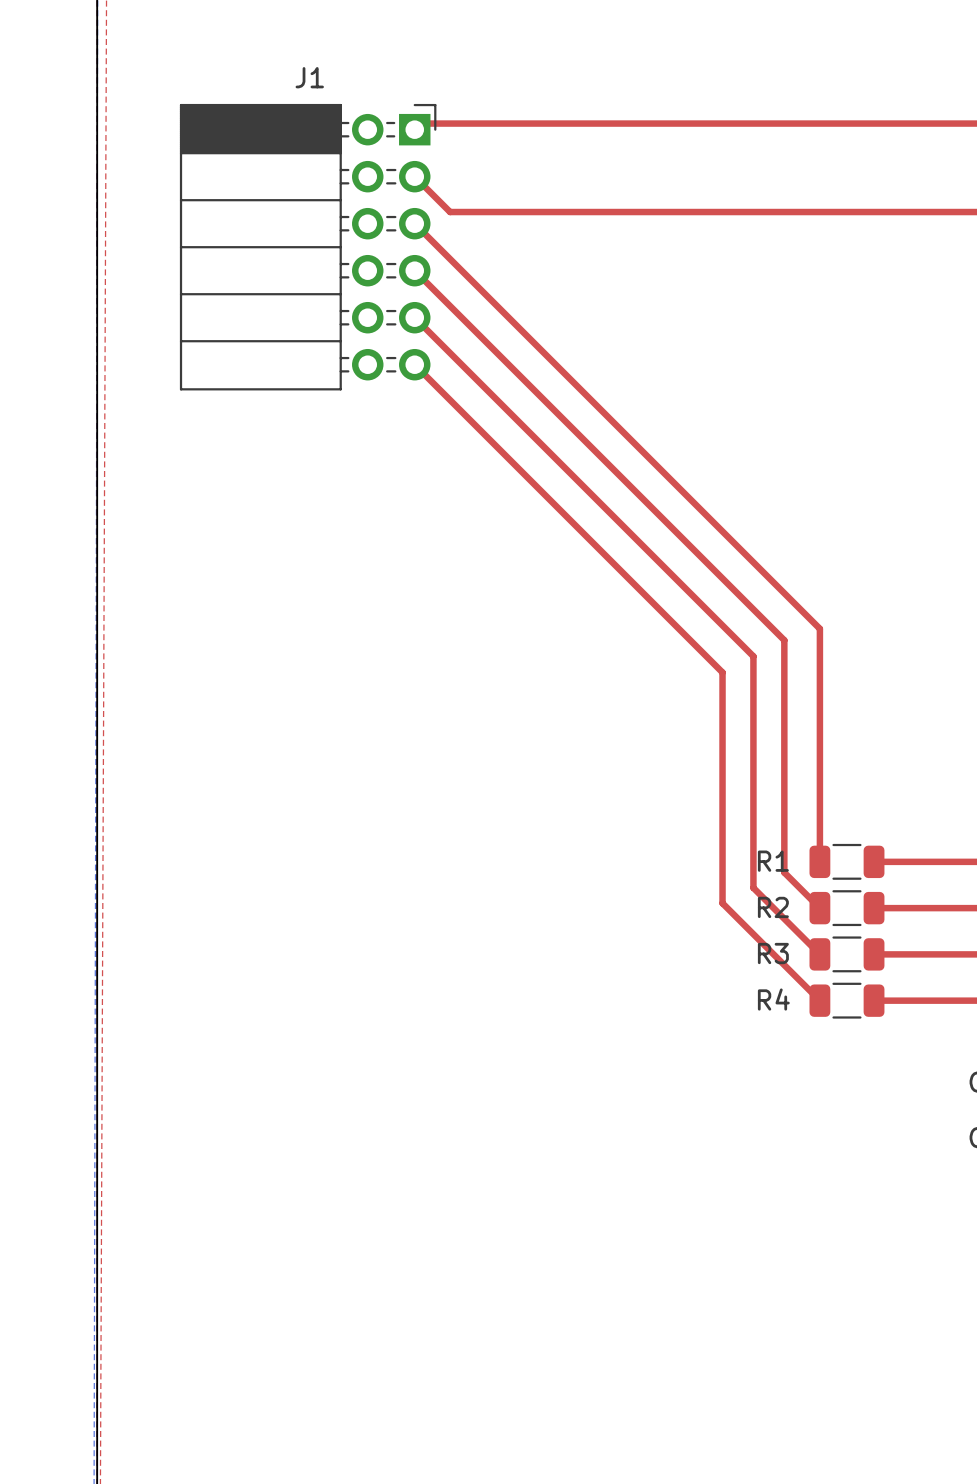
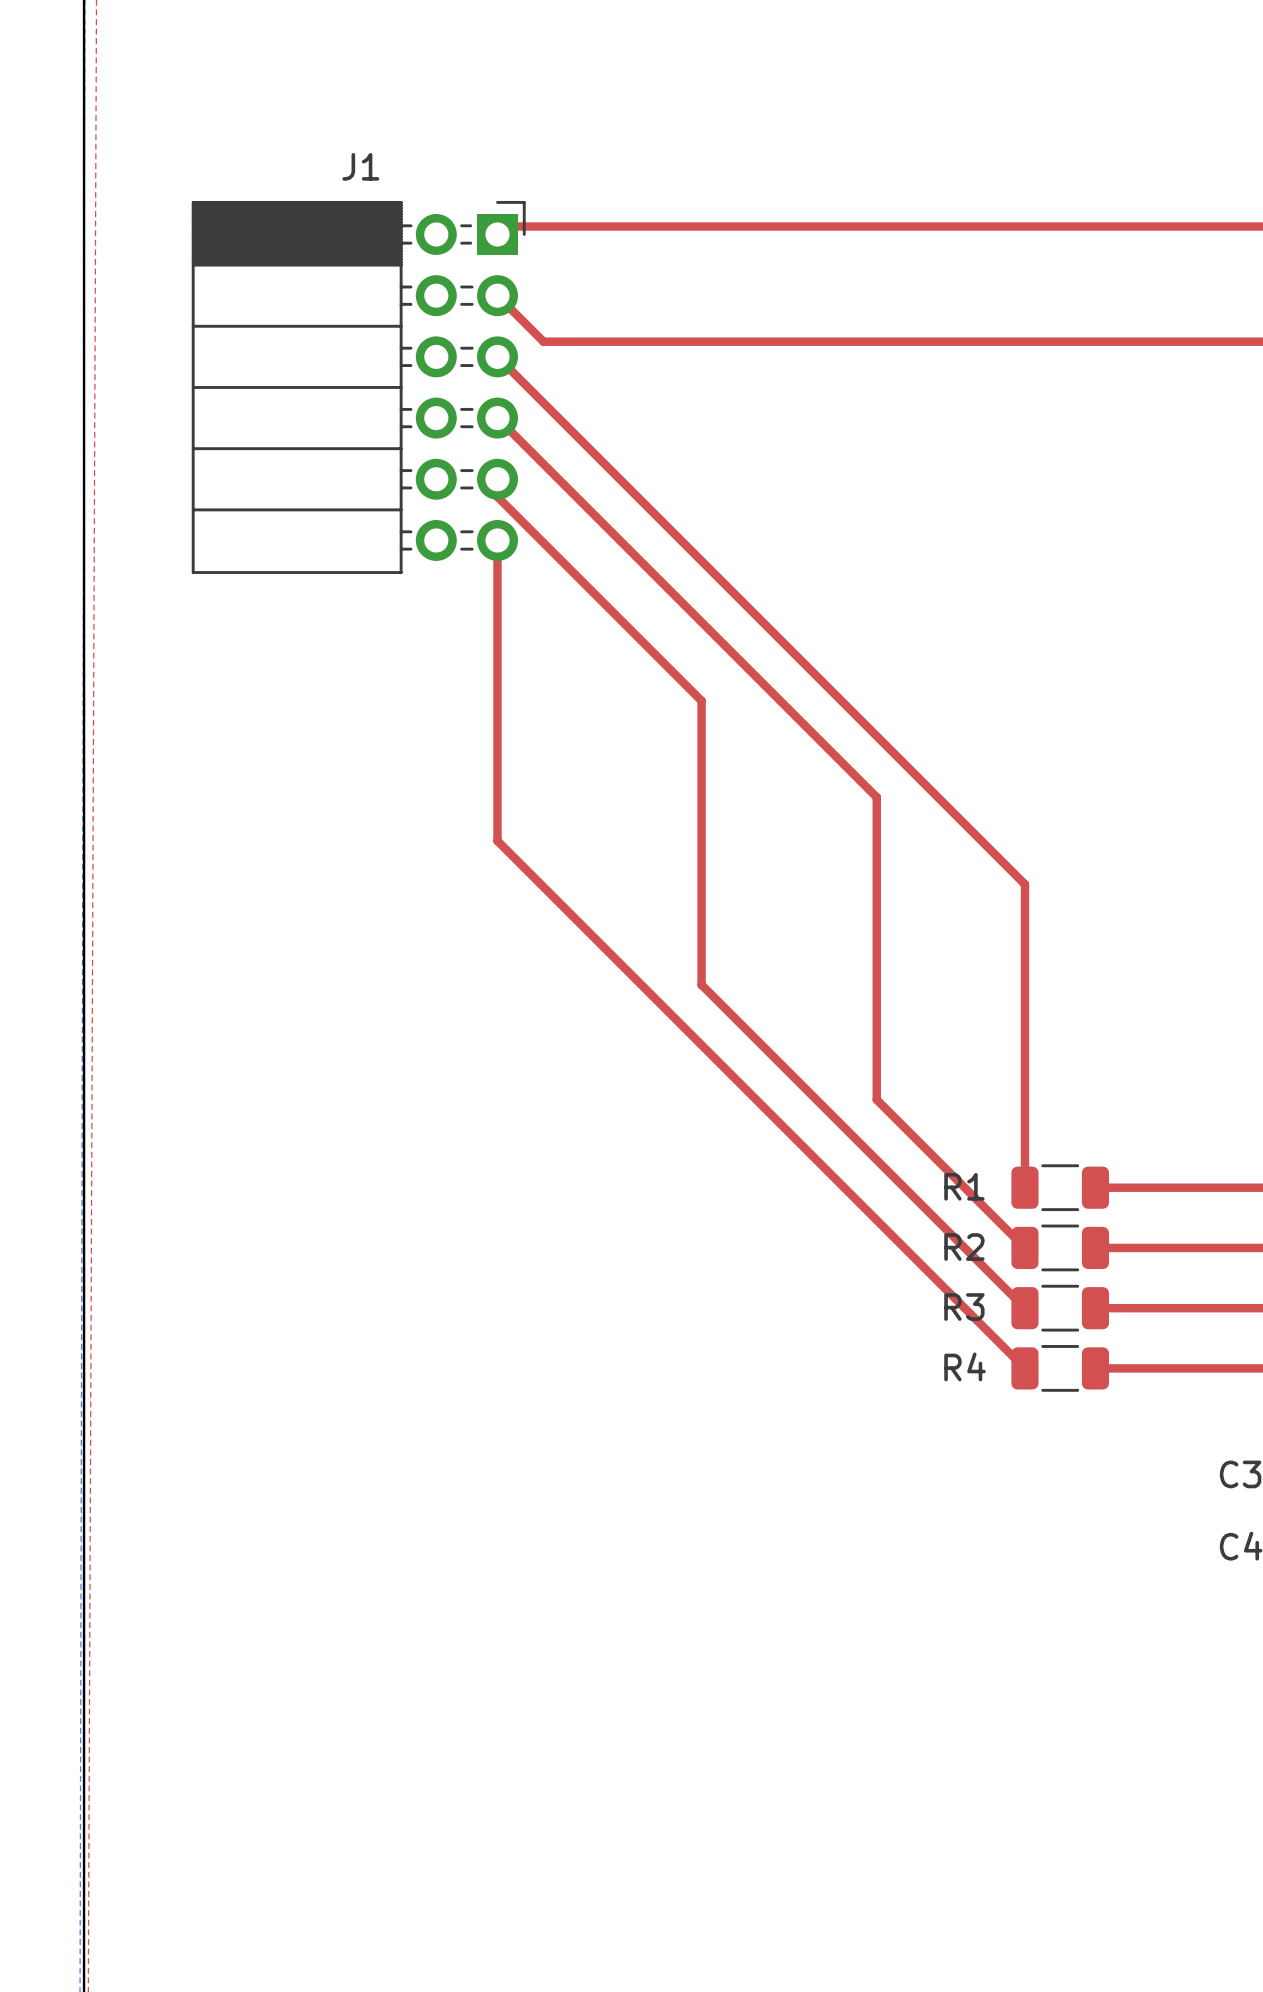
top track: (414, 317) (753, 656) (753, 887) -> (497, 479) (497, 496) (701, 700) (701, 984) (938, 1221)
top track: (414, 364) (722, 672) (722, 903) -> (497, 540) (497, 840) (898, 1241)
top track: (706, 562) (784, 640) (784, 872) -> (876, 797) (876, 1099) (978, 1201)

